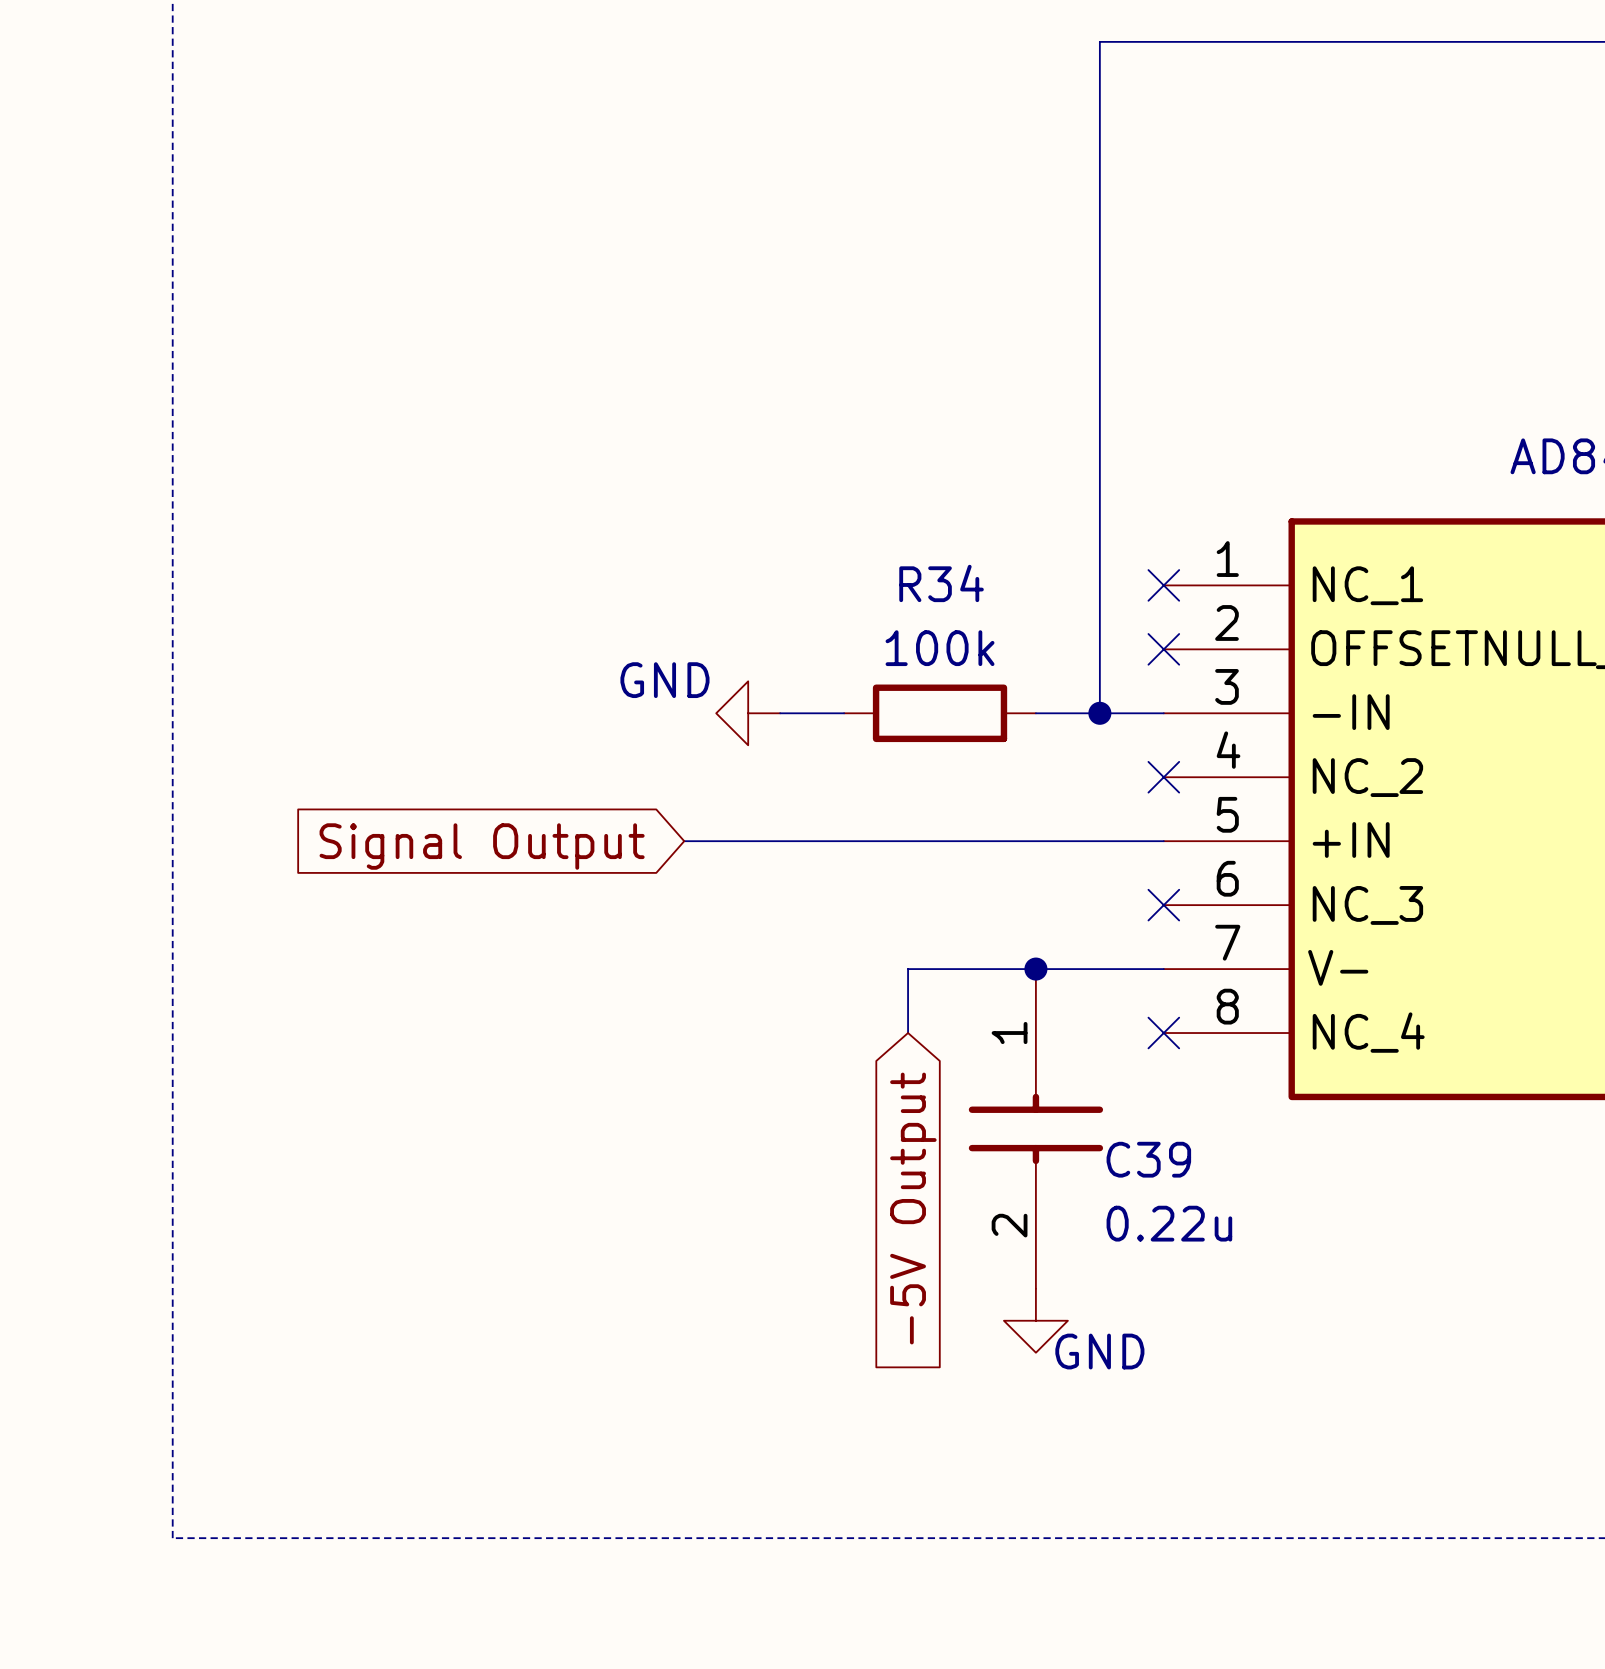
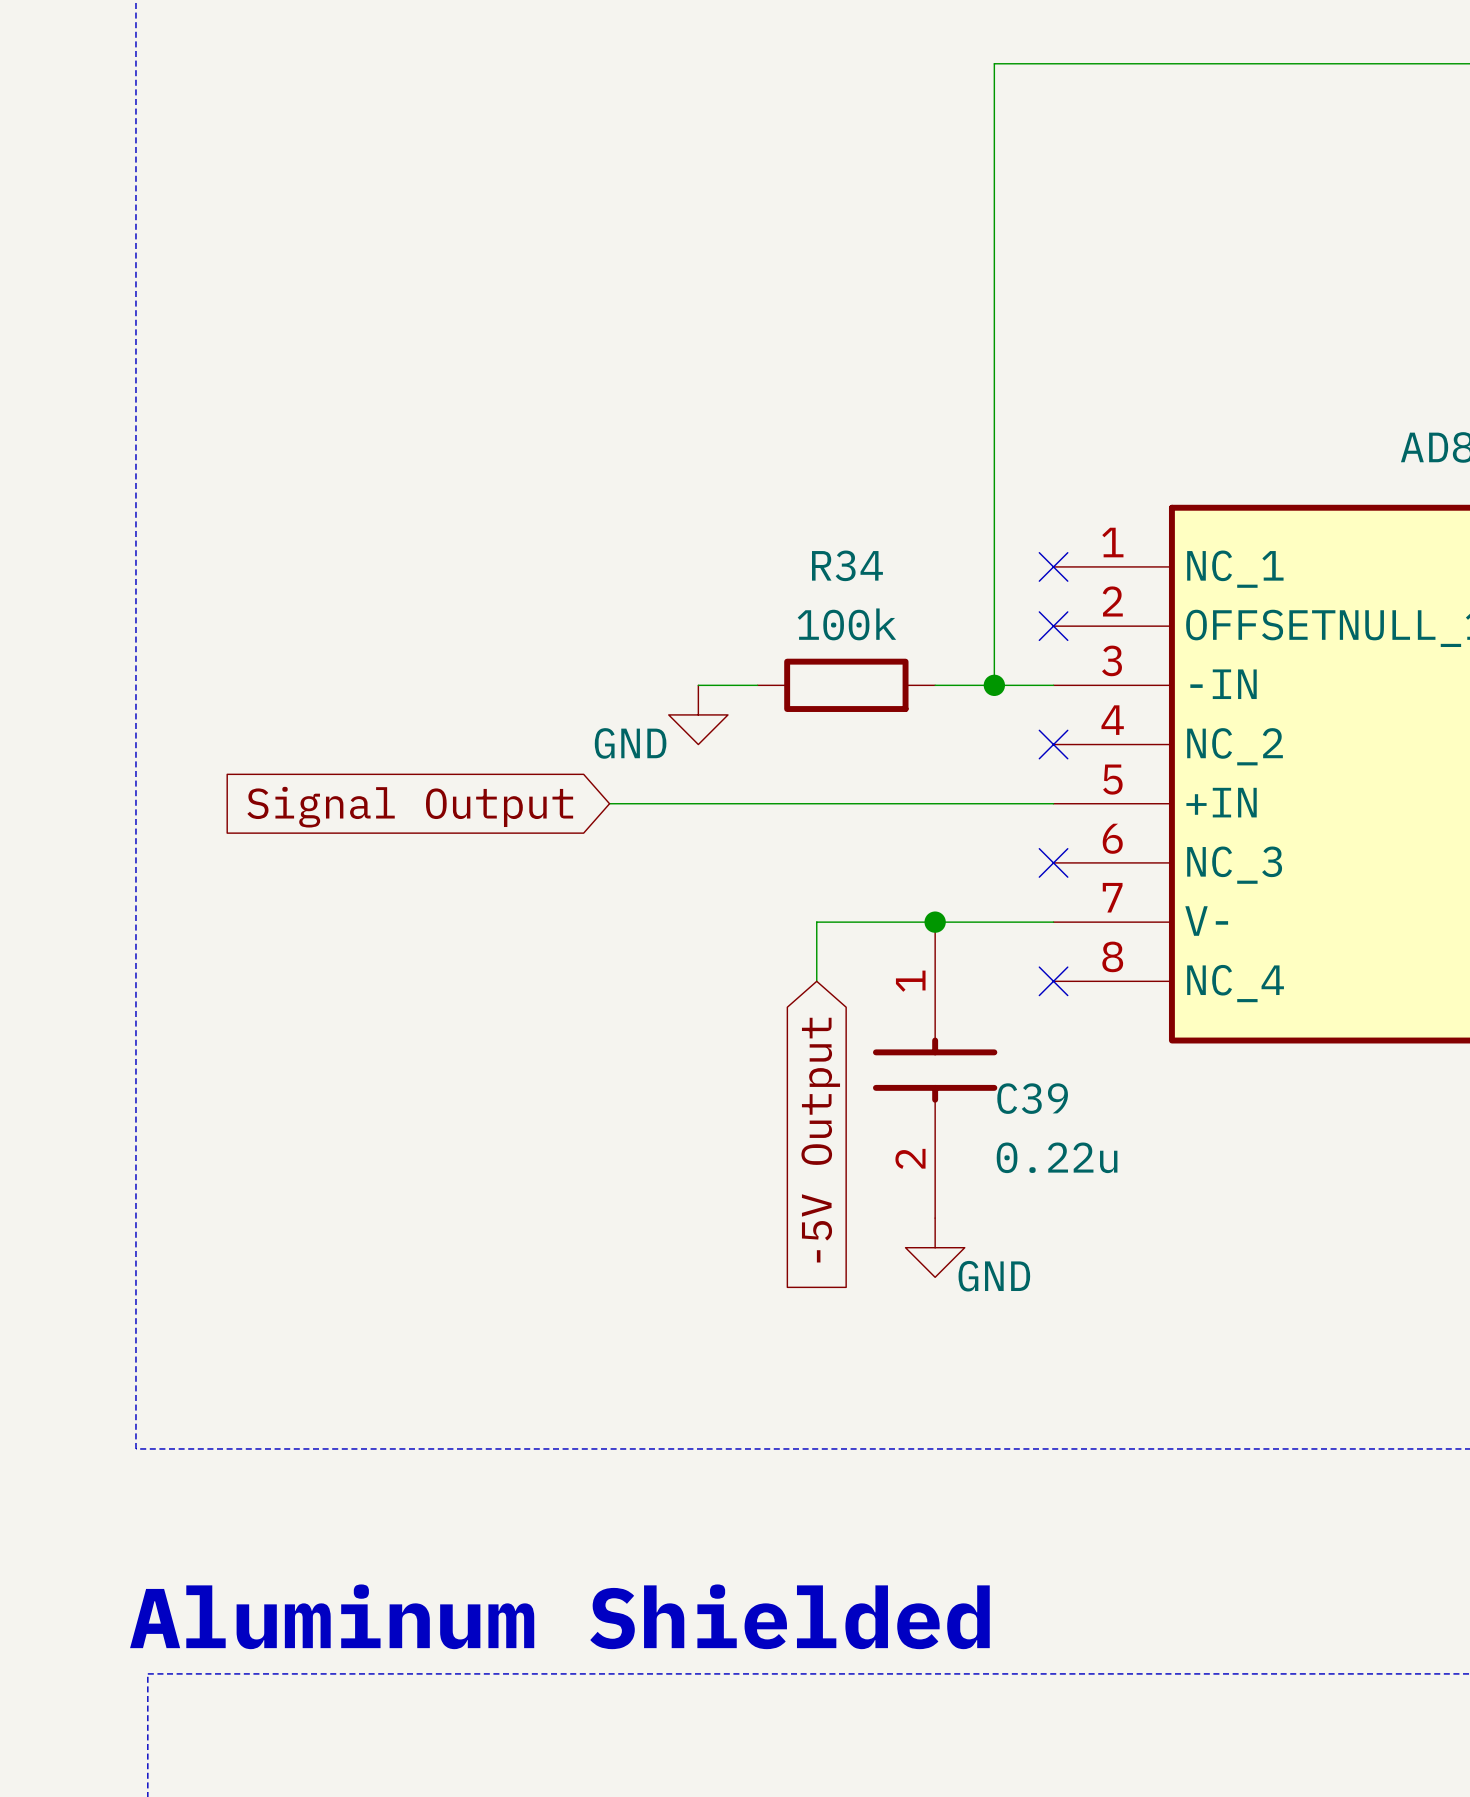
power symbol text position: GND (664, 680) -> GND (630, 743)
power symbol rotation: 0° (748, 713) -> 90° counterclockwise (698, 714)
power symbol position: GND (748, 713) -> GND (698, 714)

